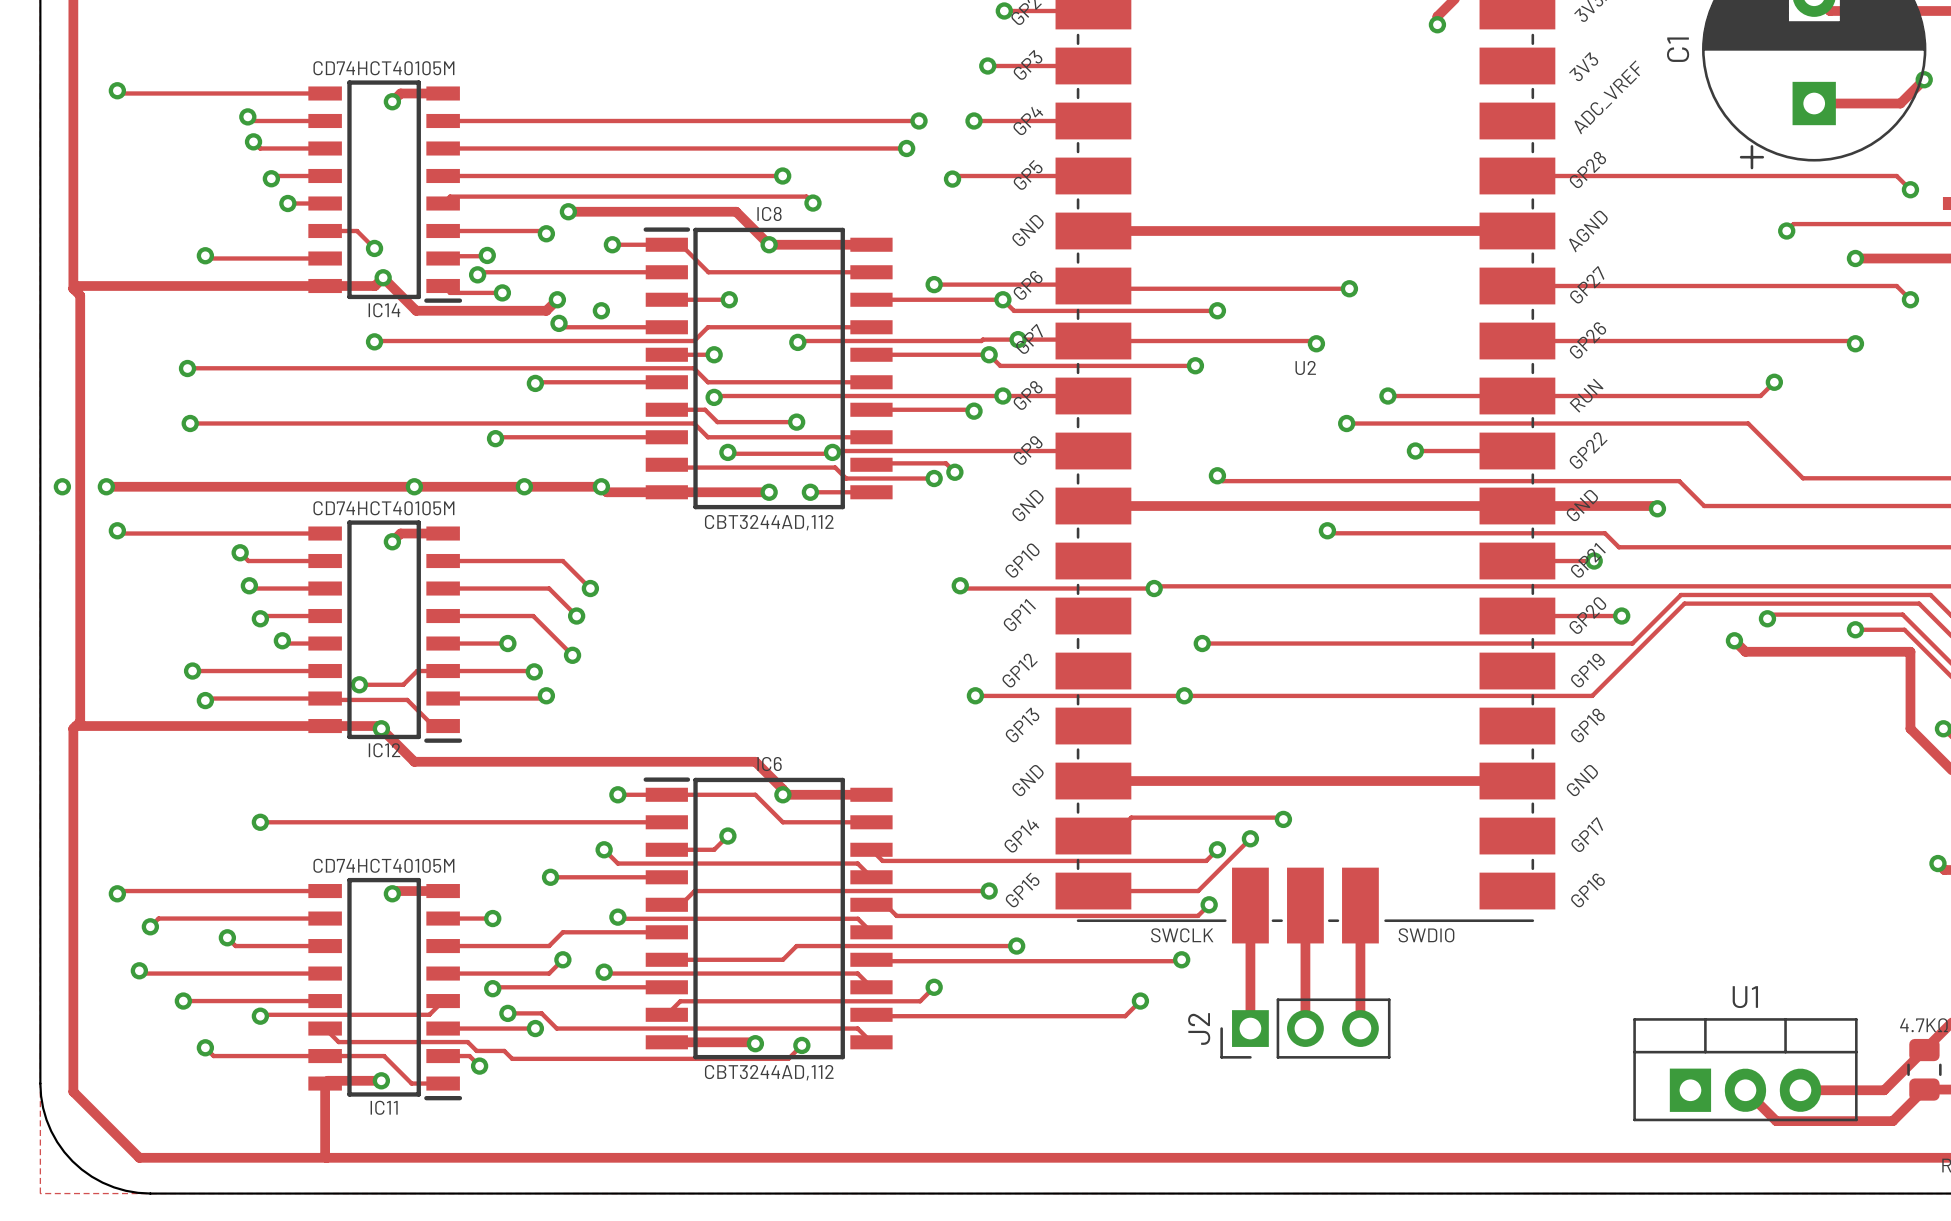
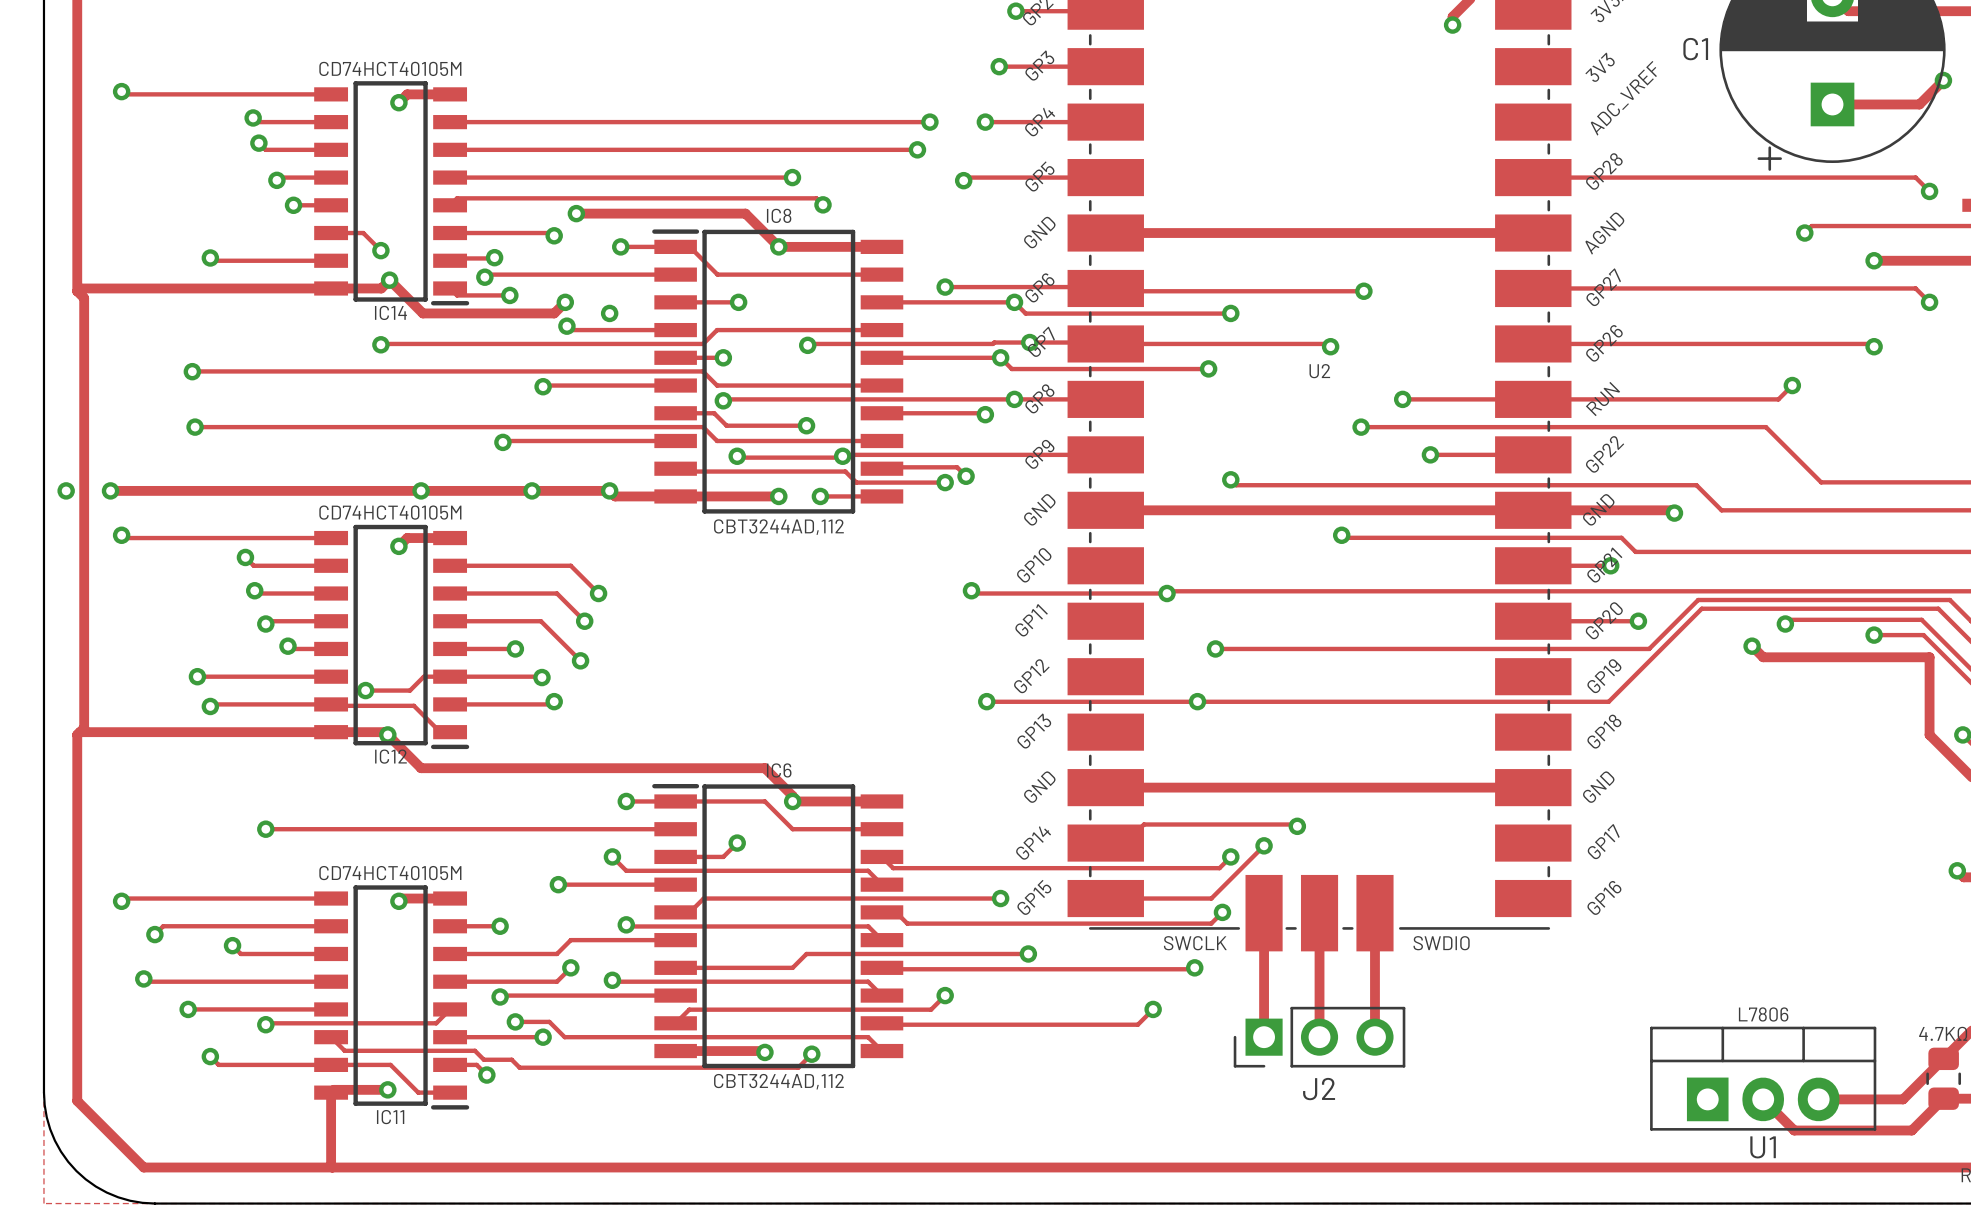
C1 name rotation: 0° (1678, 49) -> 90° clockwise (1695, 49)
U1 name position: U1 (1745, 997) -> U1 (1763, 1147)
U1 value: none -> L7806 (1763, 1014)
J2 name rotation: 0° (1199, 1028) -> 90° clockwise (1319, 1089)
J2 name position: J2 (1199, 1028) -> J2 (1319, 1089)

